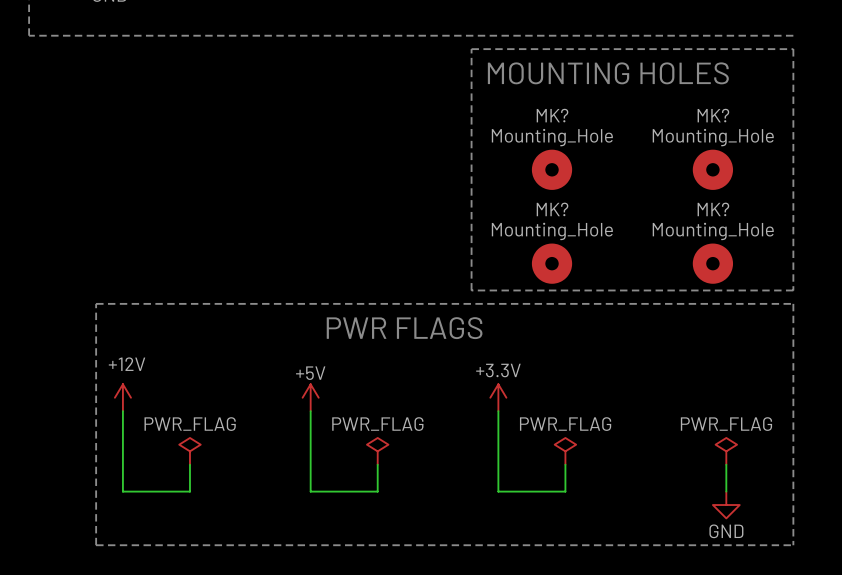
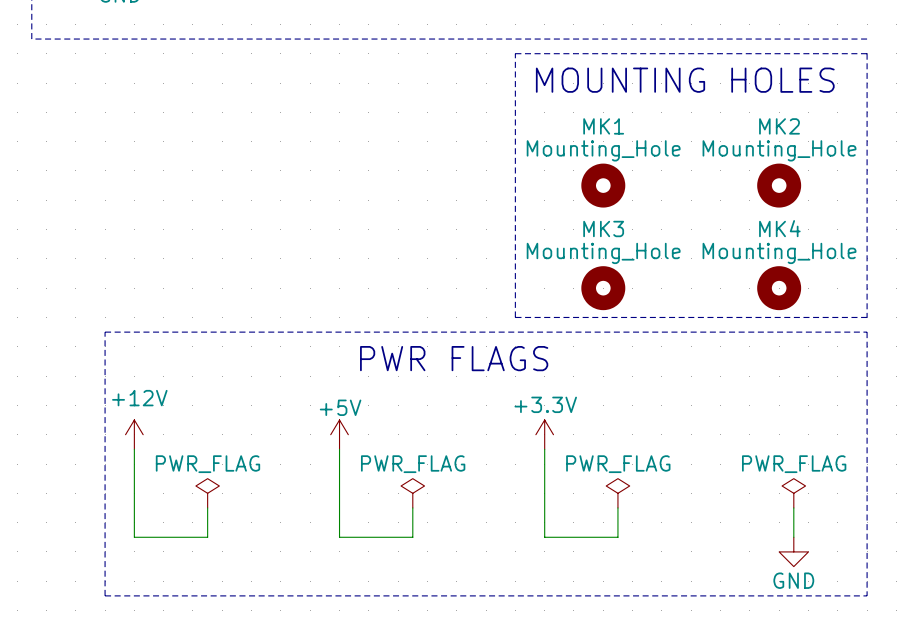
MK? name: MK? (552, 115) -> MK1 (603, 126)
MK? name: MK? (713, 115) -> MK2 (779, 126)
MK? name: MK? (552, 209) -> MK3 (603, 228)
MK? name: MK? (713, 209) -> MK4 (779, 228)

